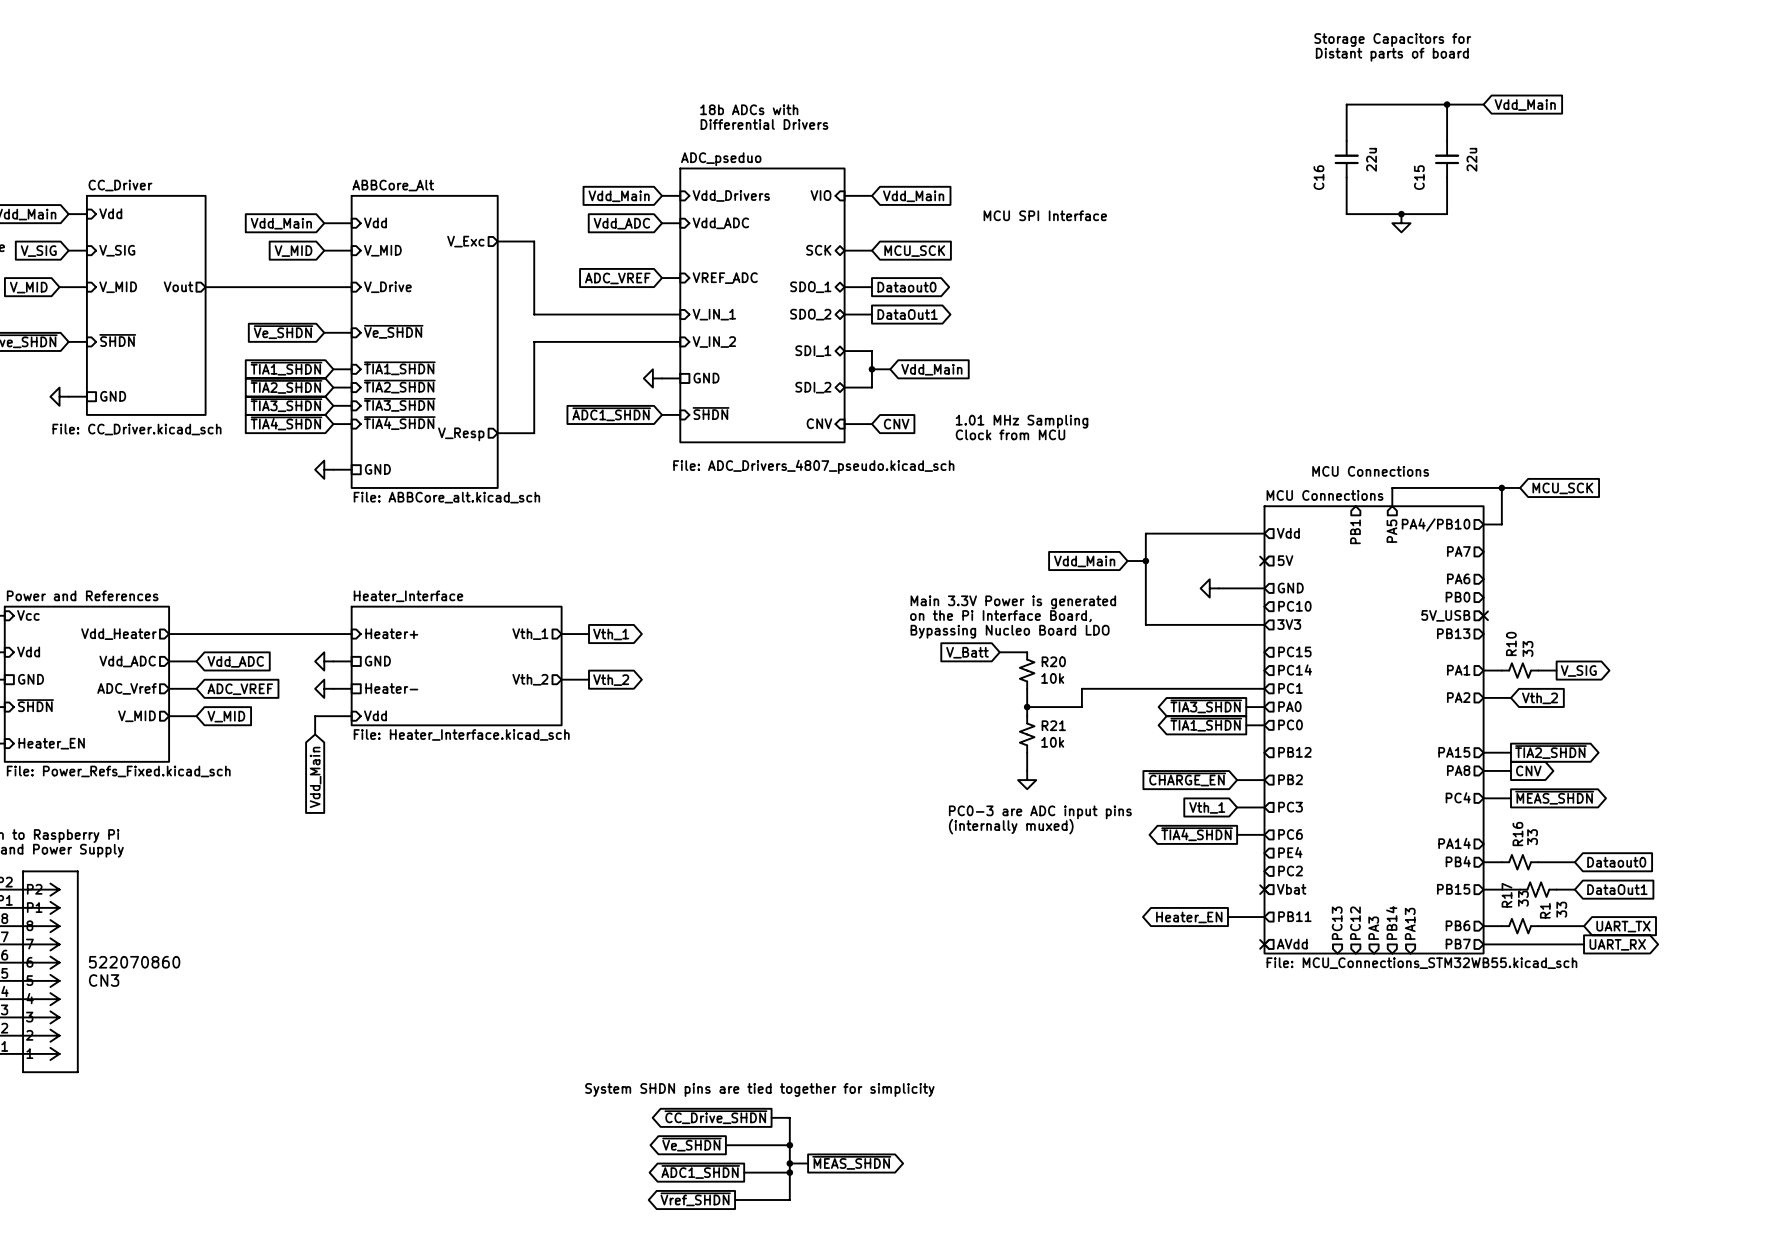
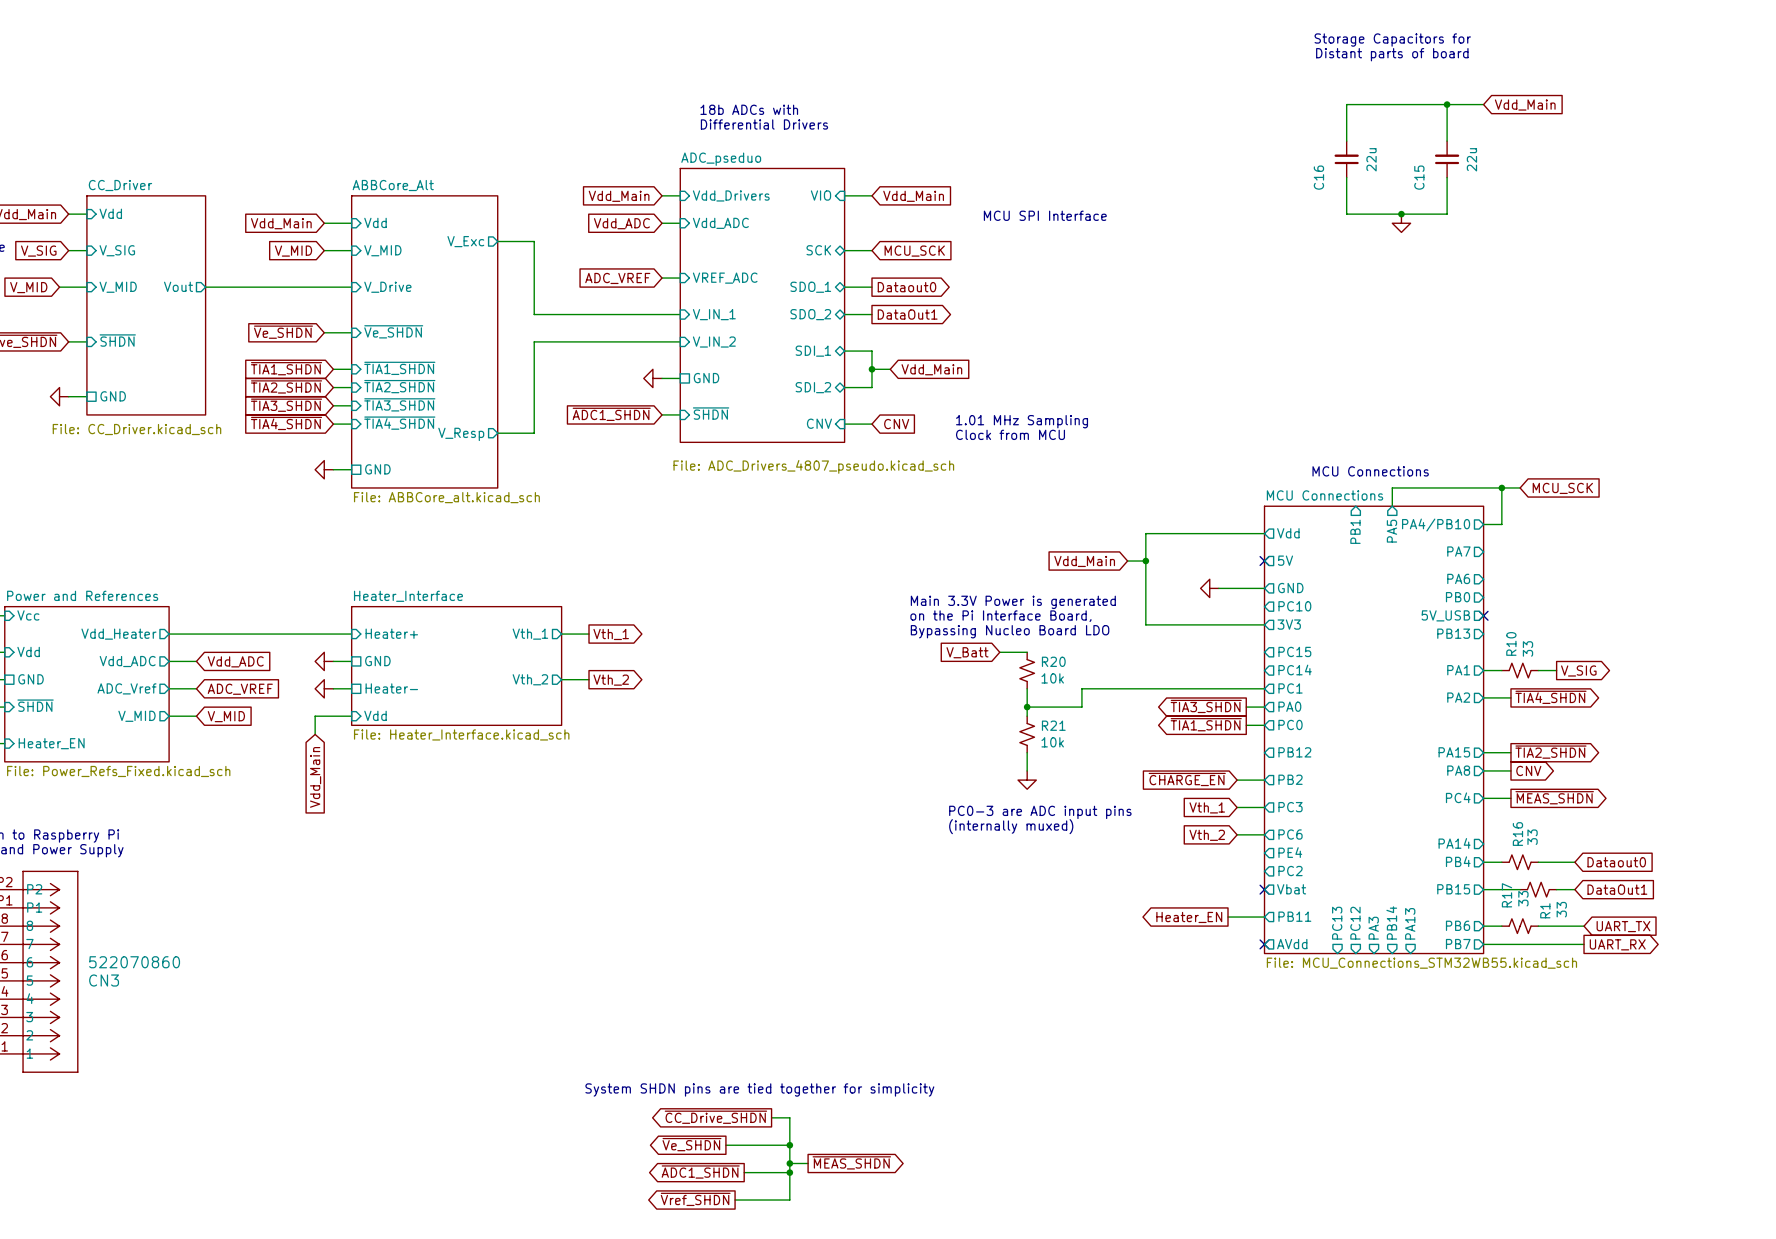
global label shape: input (1540, 698) -> output (1550, 697)
global label: Vth_2 (1540, 698) -> ~{TIA4_SHDN} (1550, 697)
global label shape: output (1197, 834) -> input (1207, 835)
global label: ~{TIA4_SHDN} (1197, 834) -> Vth_2 (1207, 835)

